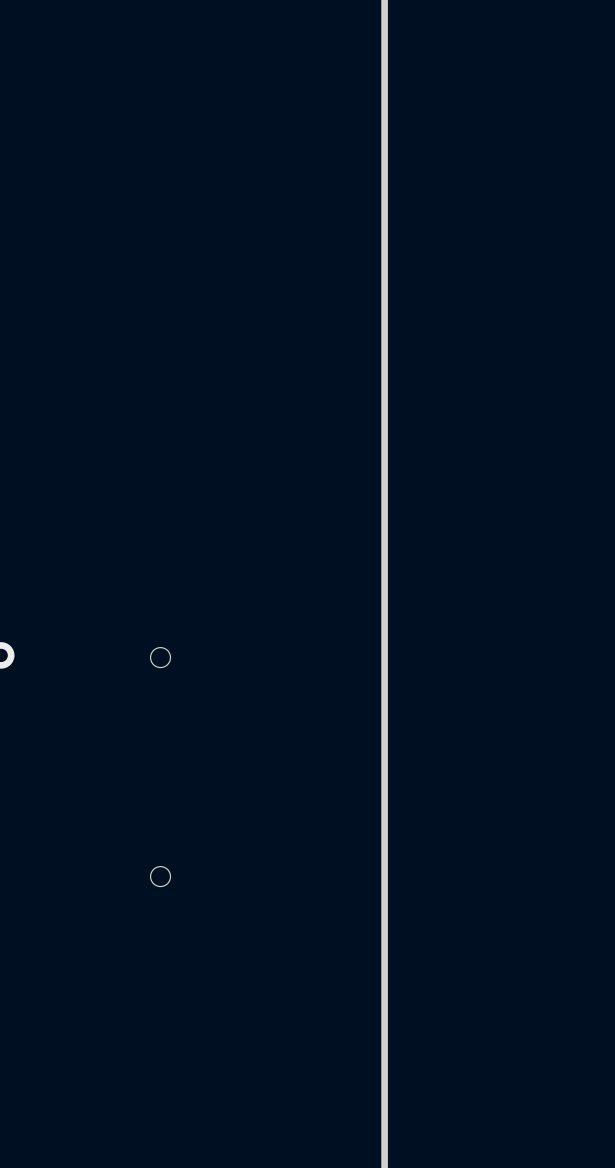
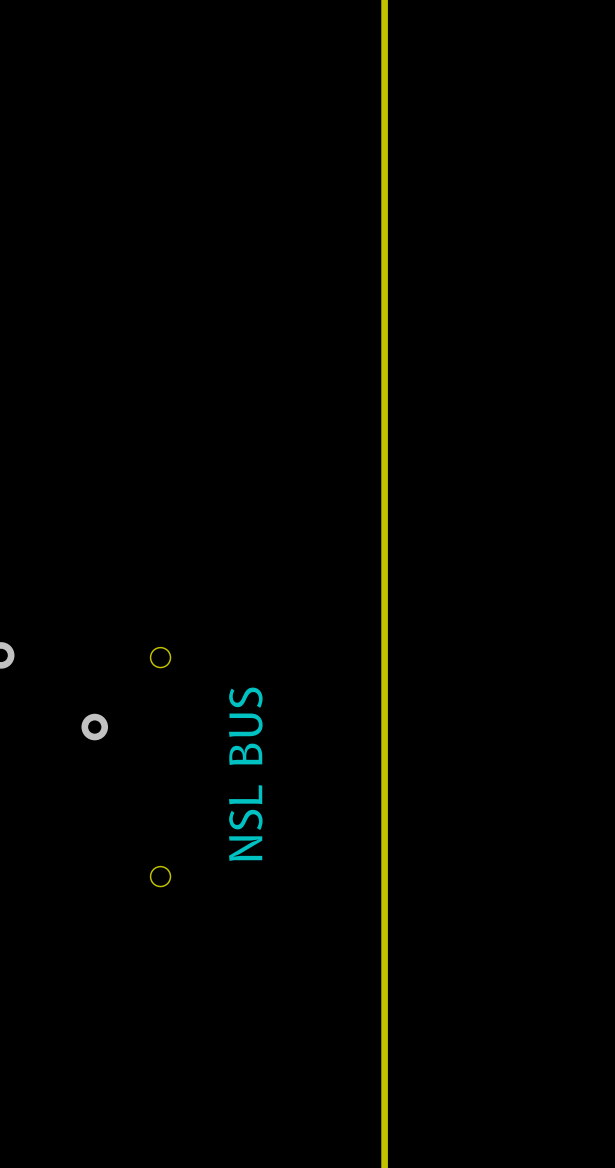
via: none -> (94, 727)
text: none -> NSL BUS (245, 774)

